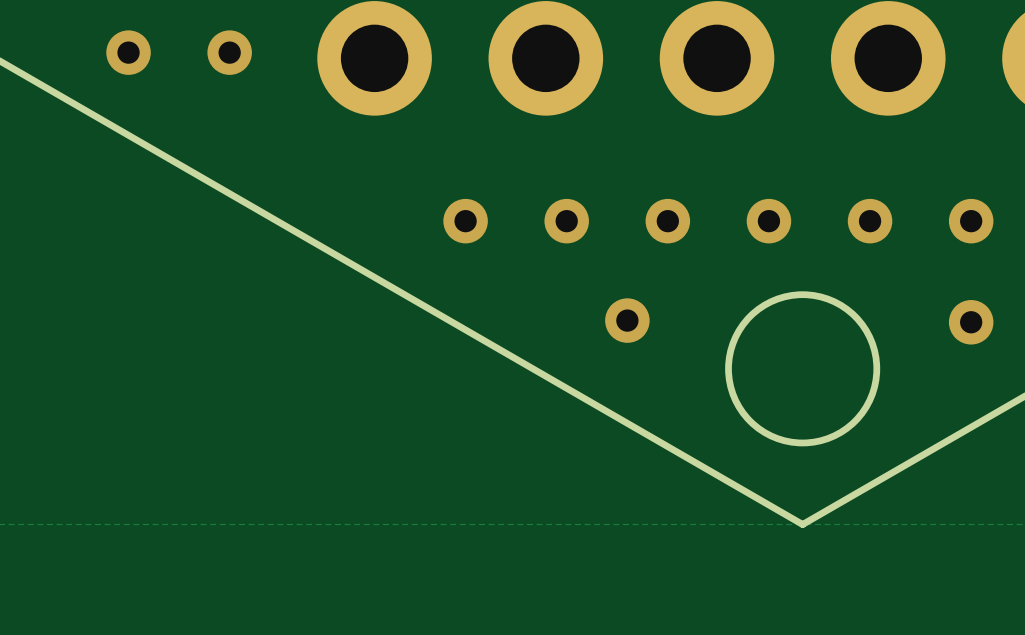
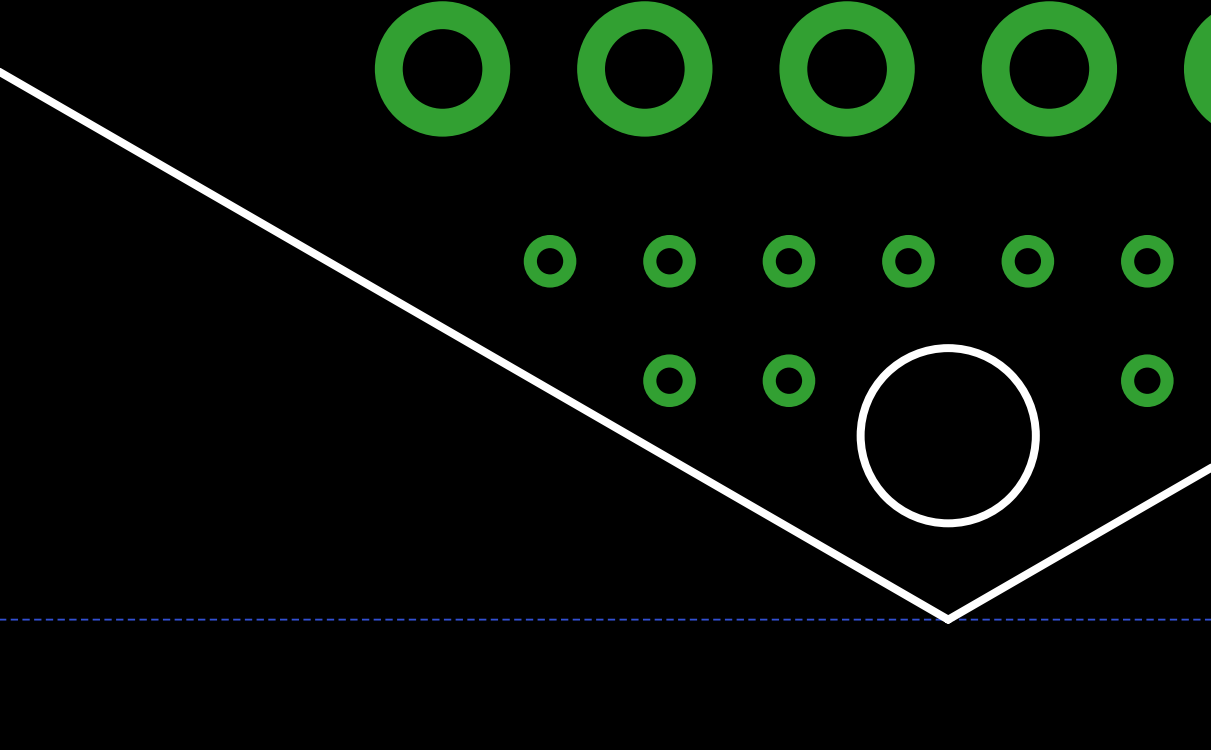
via: (128, 52) -> none
via: (229, 52) -> none
via position: (627, 320) -> (788, 380)
via: none -> (669, 380)

